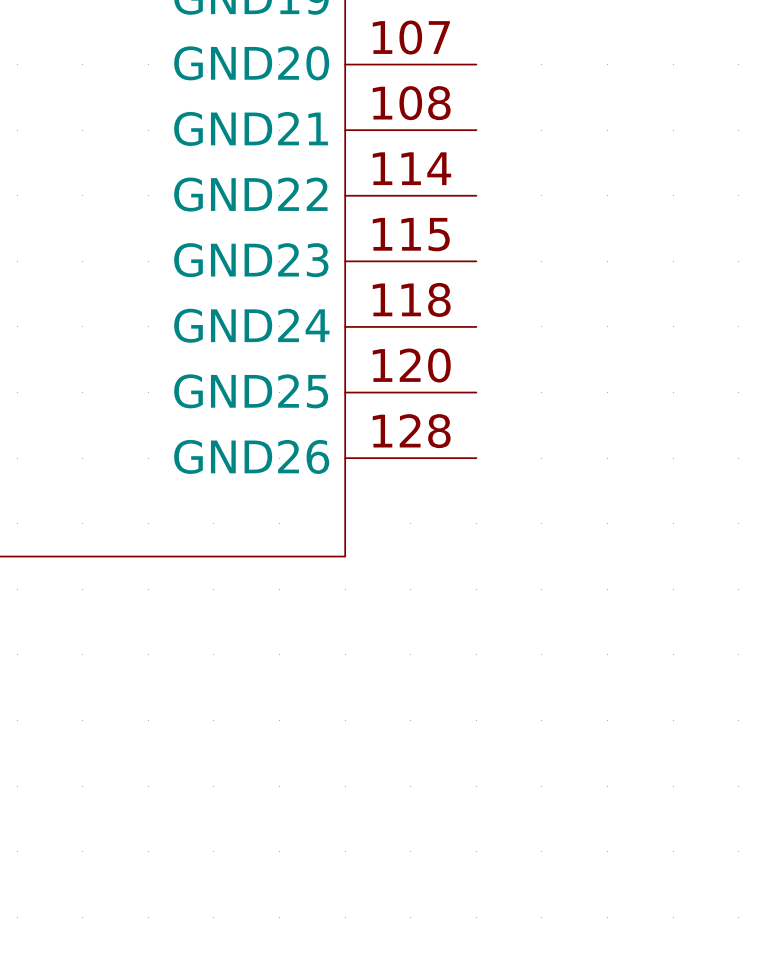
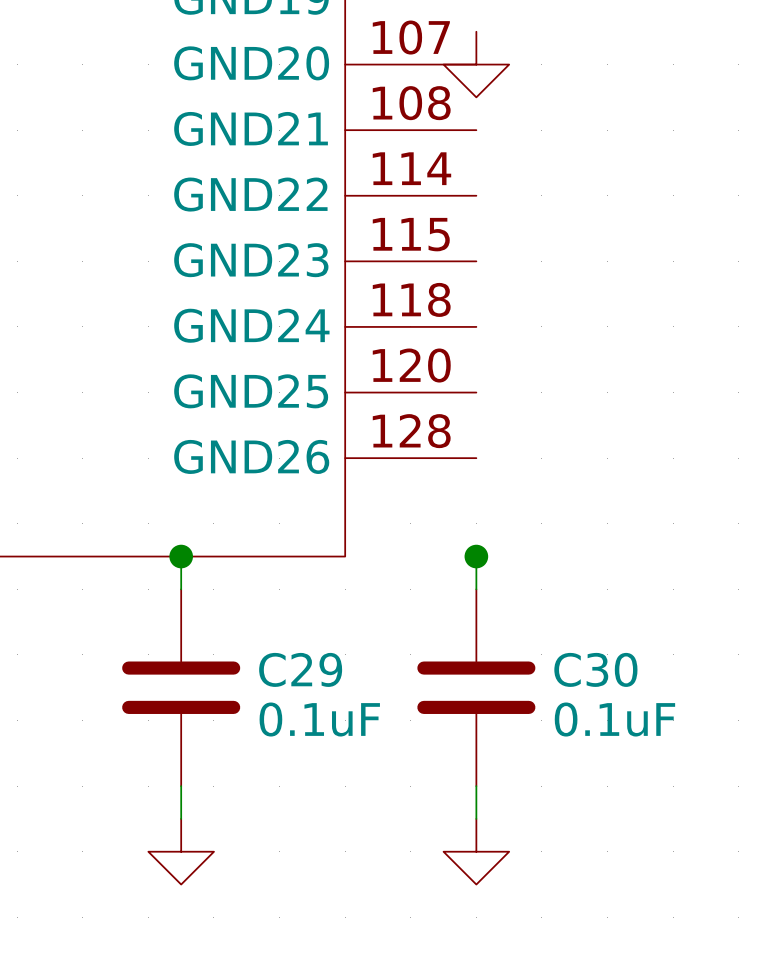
power symbol: none -> (476, 64)
wire: none -> (181, 556) (181, 589)
junction: none -> (181, 556)
wire: none -> (476, 556) (476, 589)
junction: none -> (476, 556)
C29: none -> 0.1uF (181, 687)
C30: none -> 0.1uF (476, 687)
wire: none -> (181, 786) (181, 818)
wire: none -> (476, 786) (476, 818)
power symbol: none -> (181, 851)
power symbol: none -> (476, 851)

